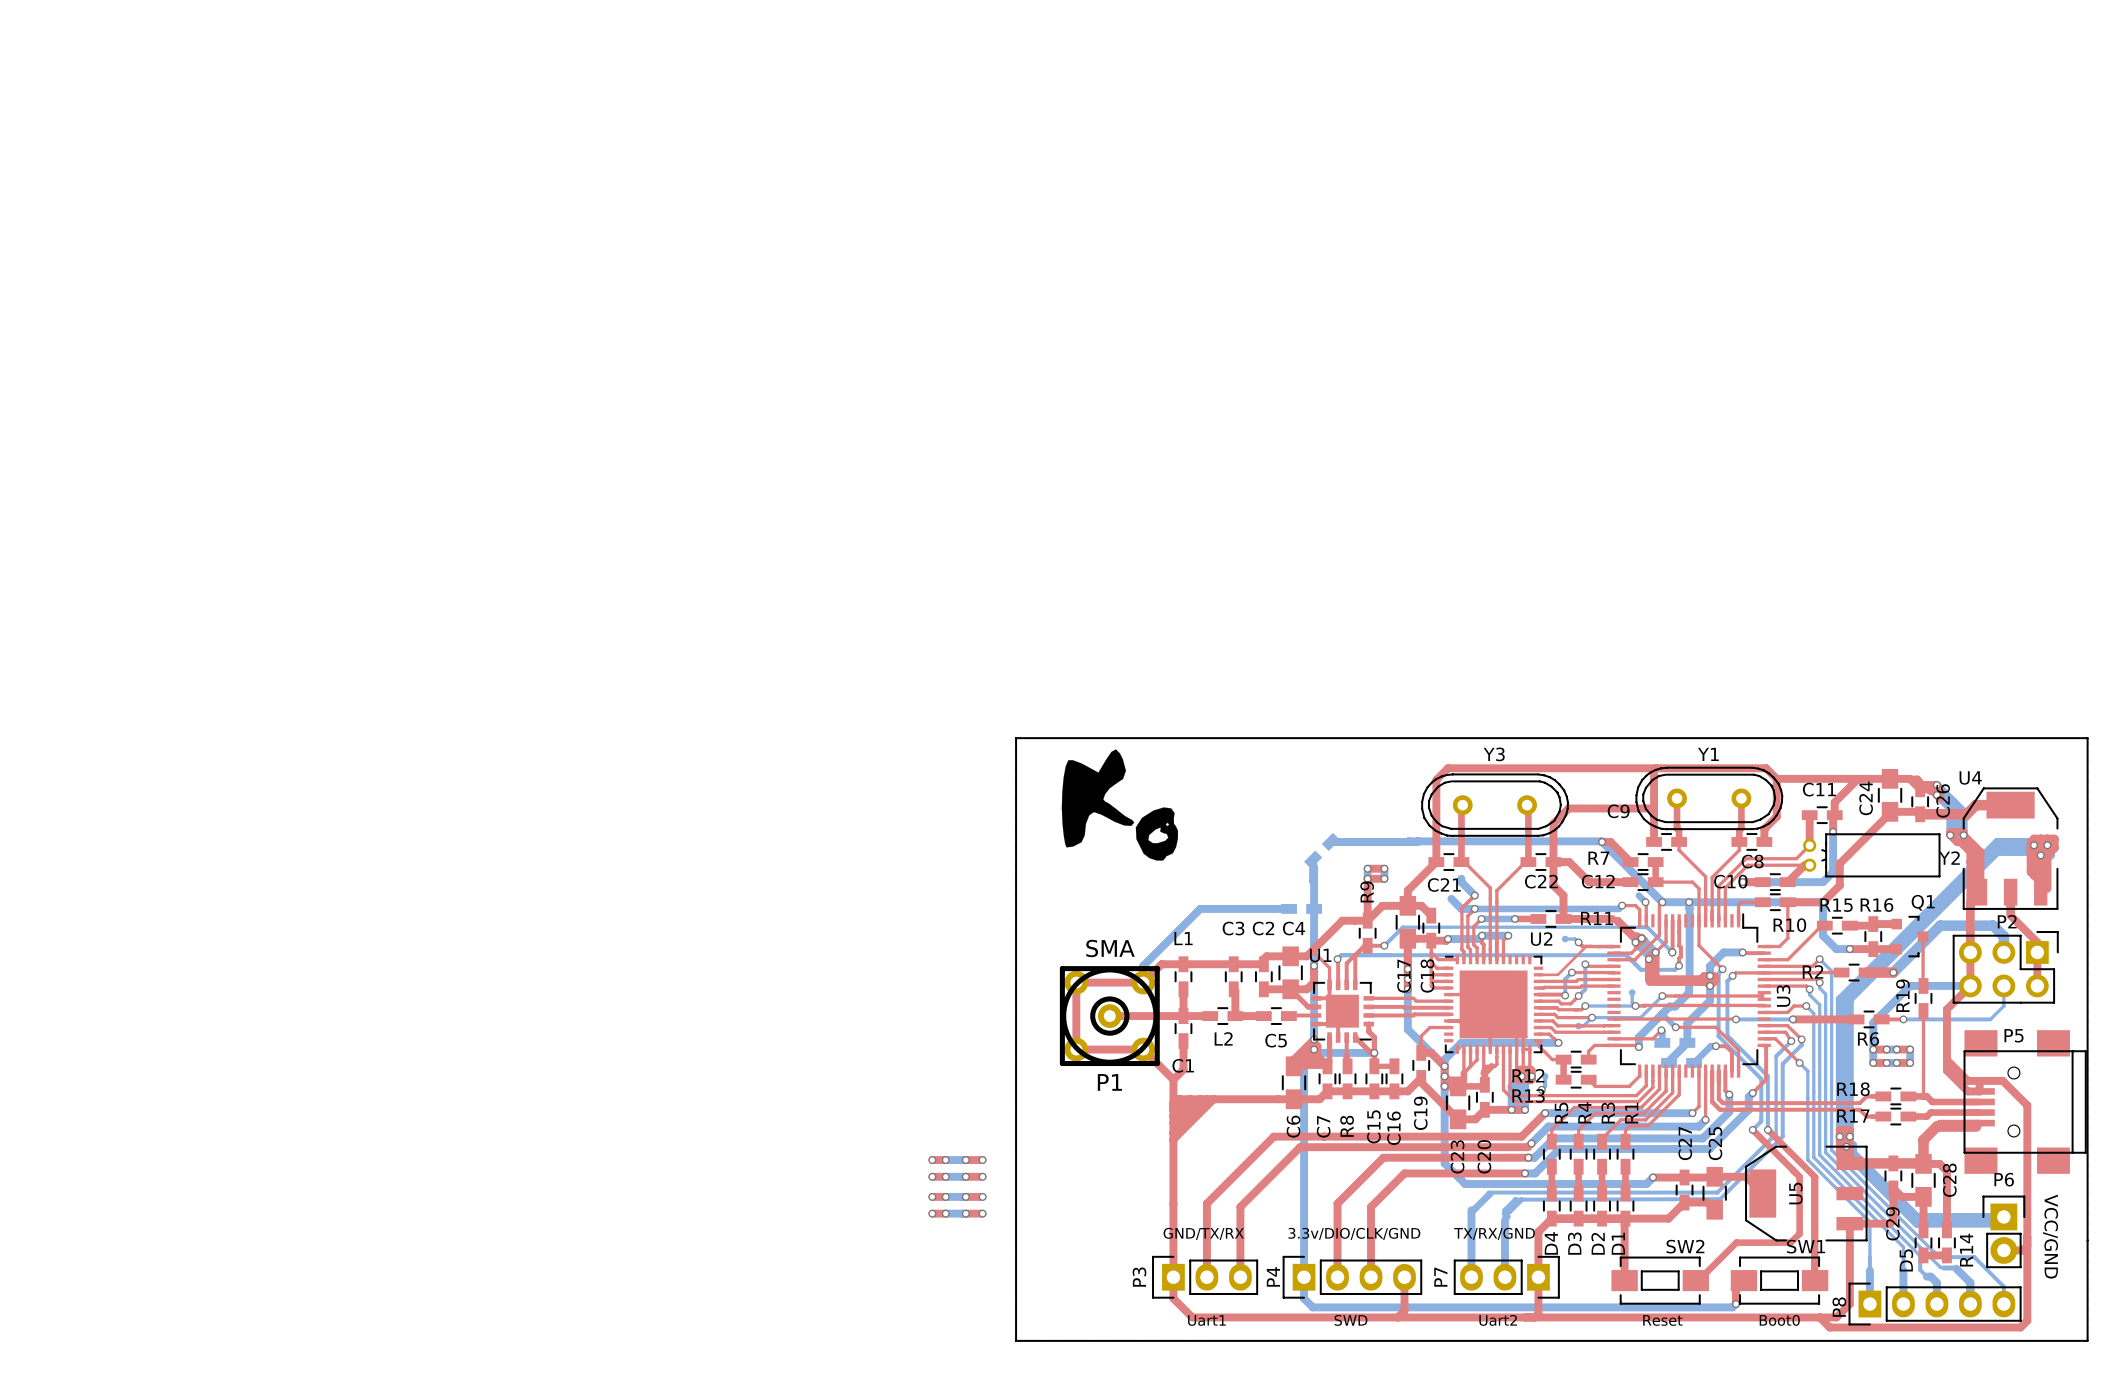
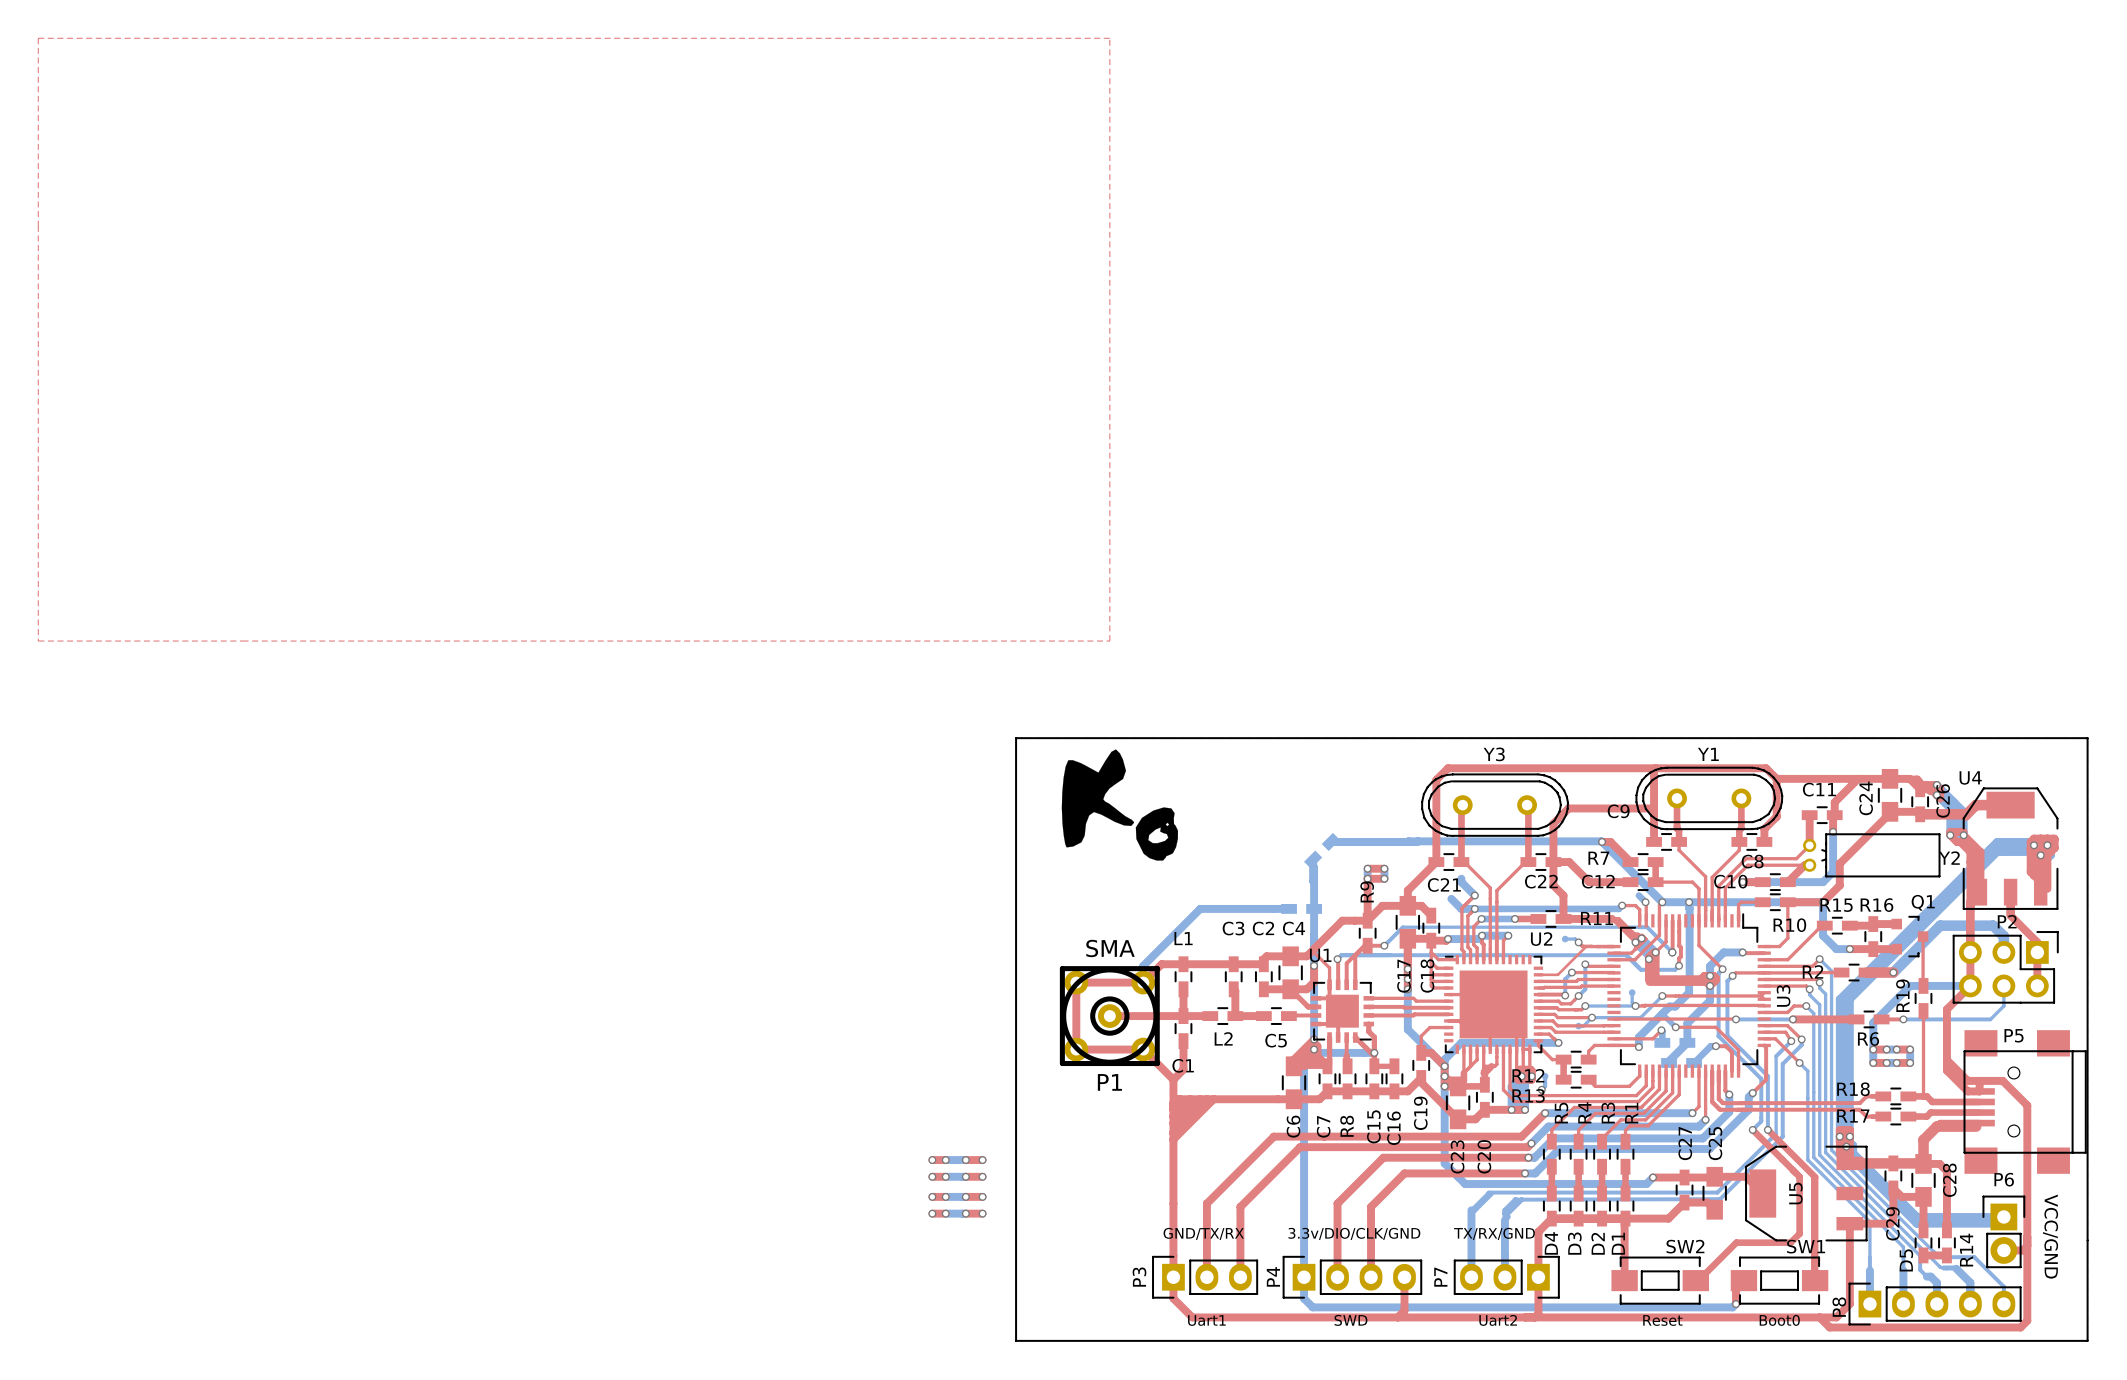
top zone outline: none -> (38, 38) (1109, 38) (1109, 641) (38, 641) (38, 38)

